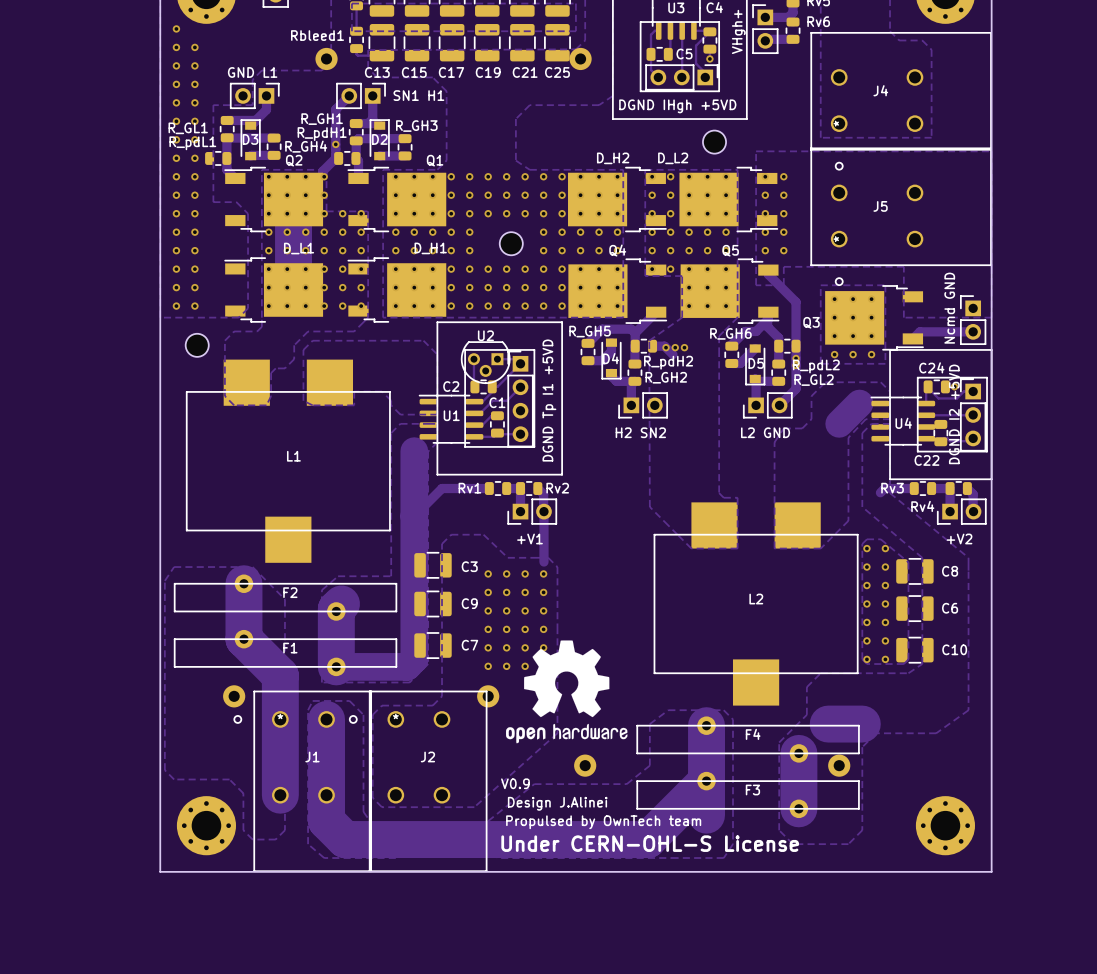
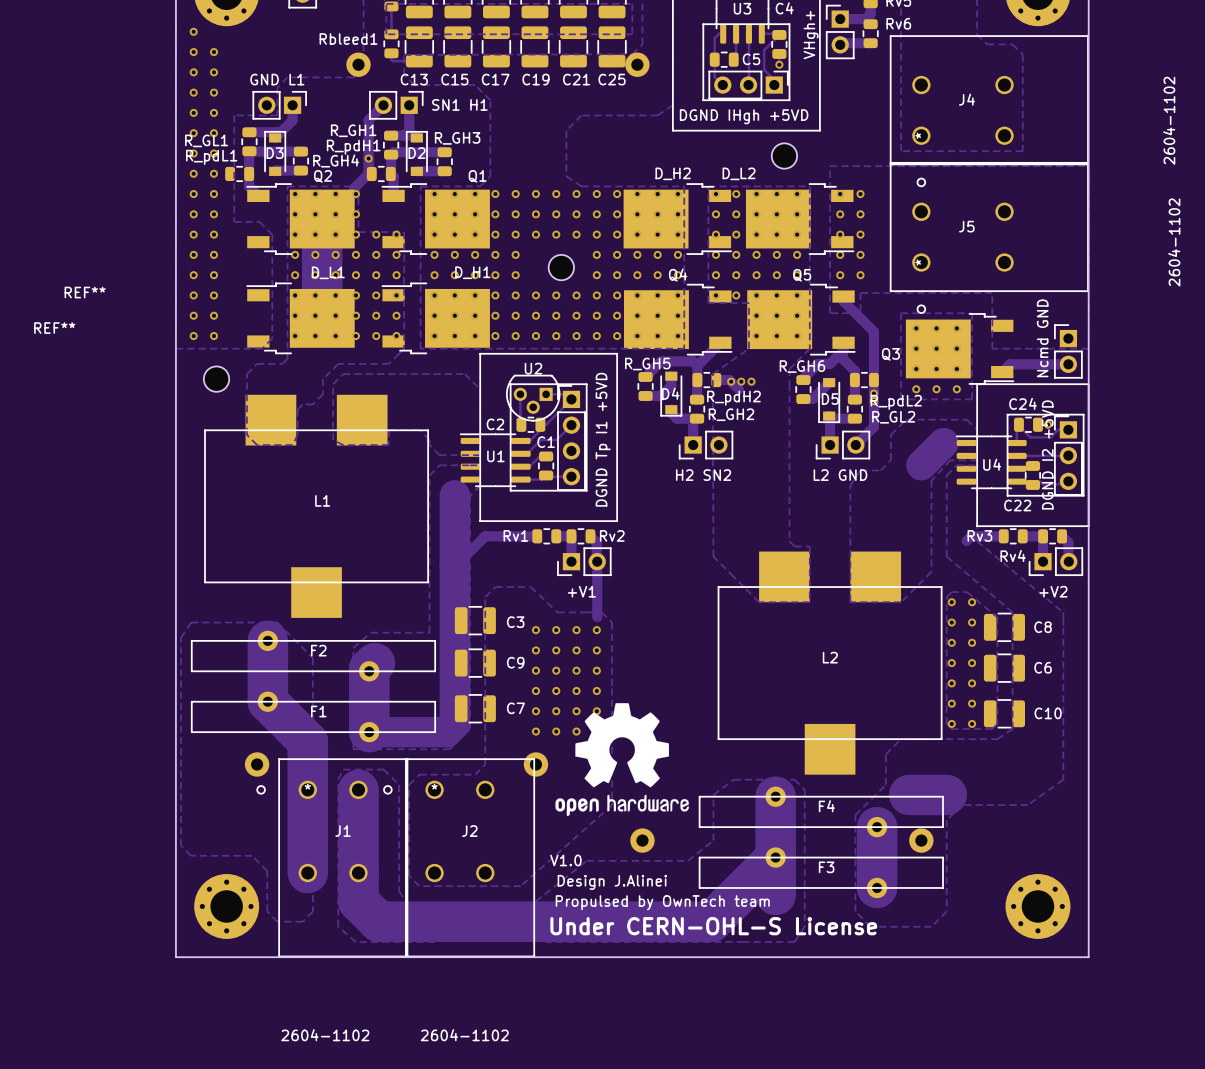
J4 value: none -> 2604-1102 (1169, 120)
J5 value: none -> 2604-1102 (1174, 242)
REF** name: none -> REF** (85, 292)
REF** name: none -> REF** (54, 328)
text: V0.9 (515, 783) -> V1.0 (565, 860)
J1 value: none -> 2604-1102 (325, 1035)
J2 value: none -> 2604-1102 (464, 1035)

